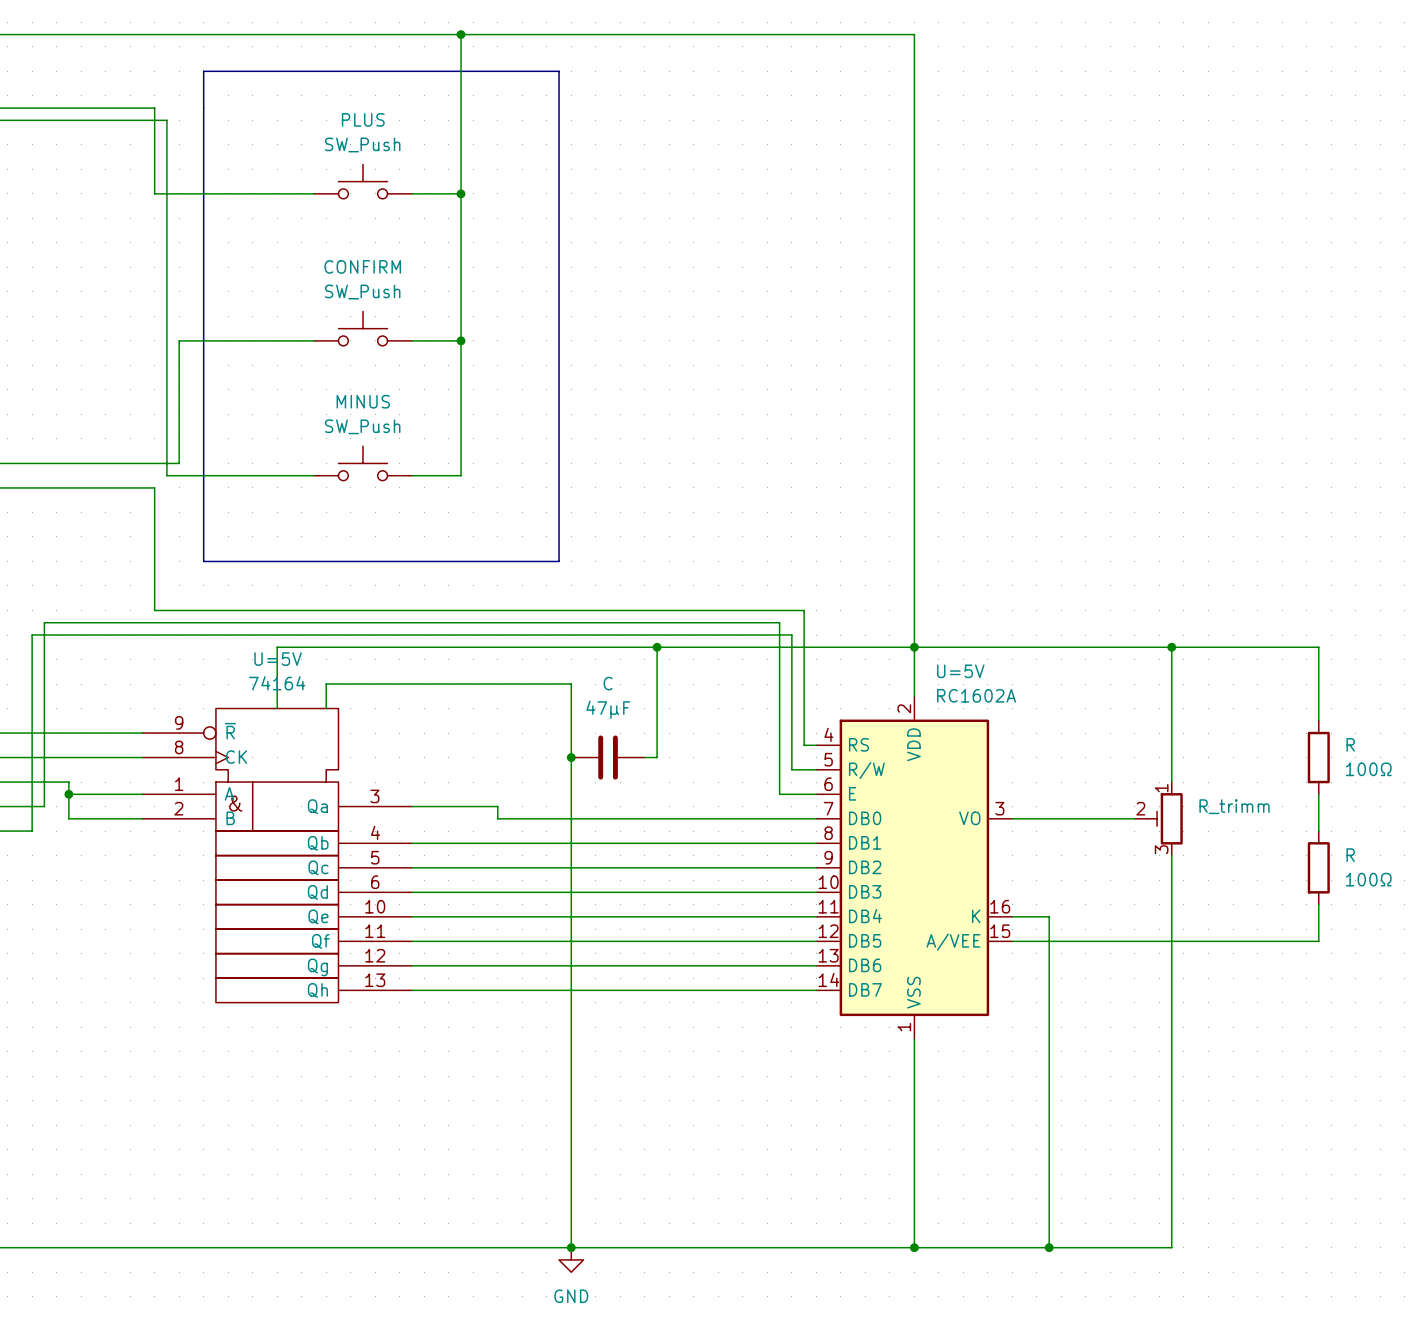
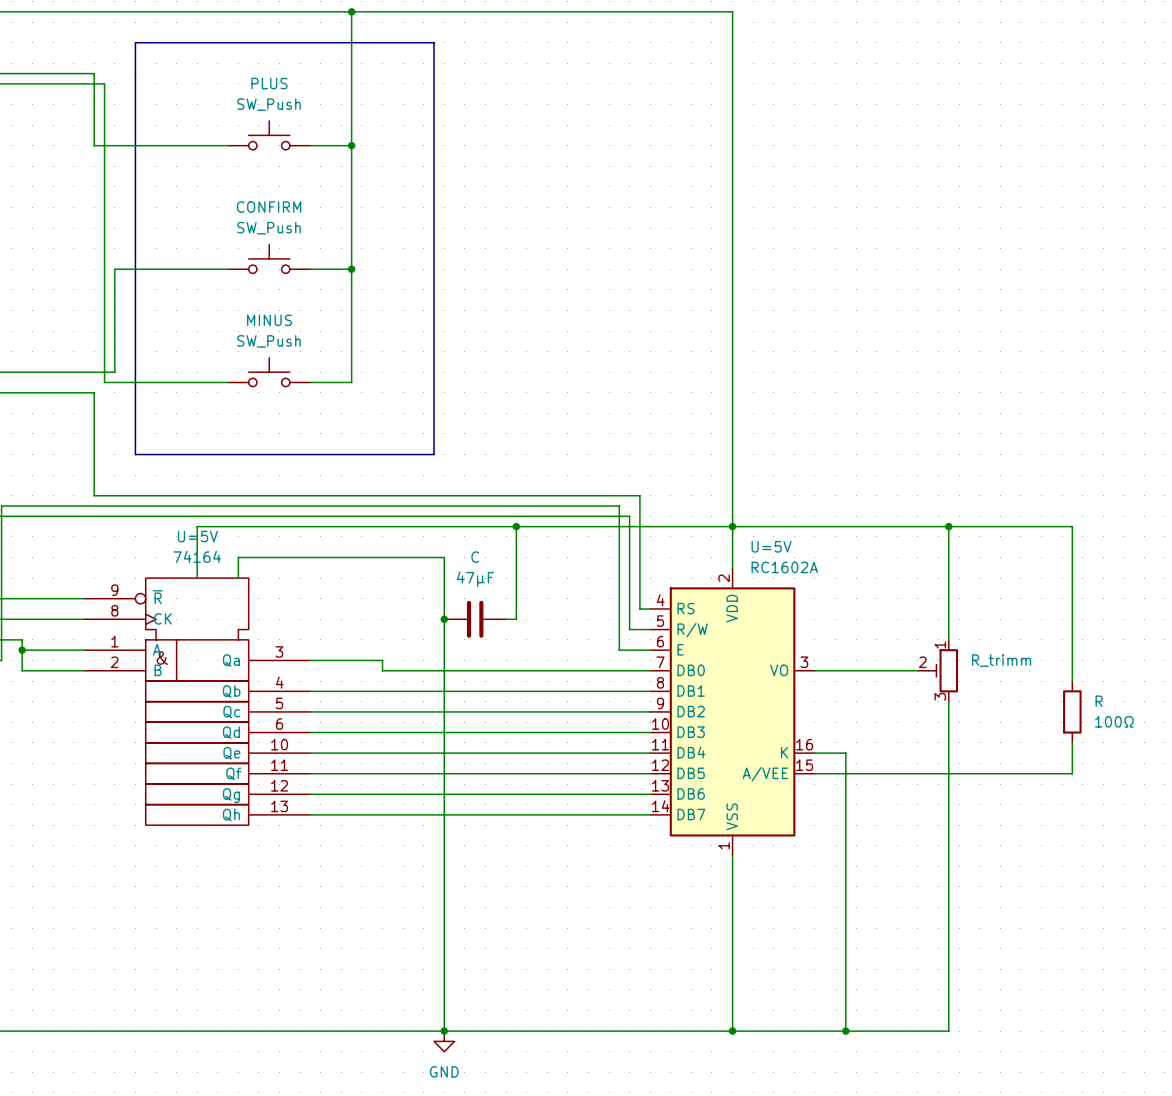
wire: none -> (1072, 588) (1072, 650)
R: 100Ω (1318, 757) -> none

